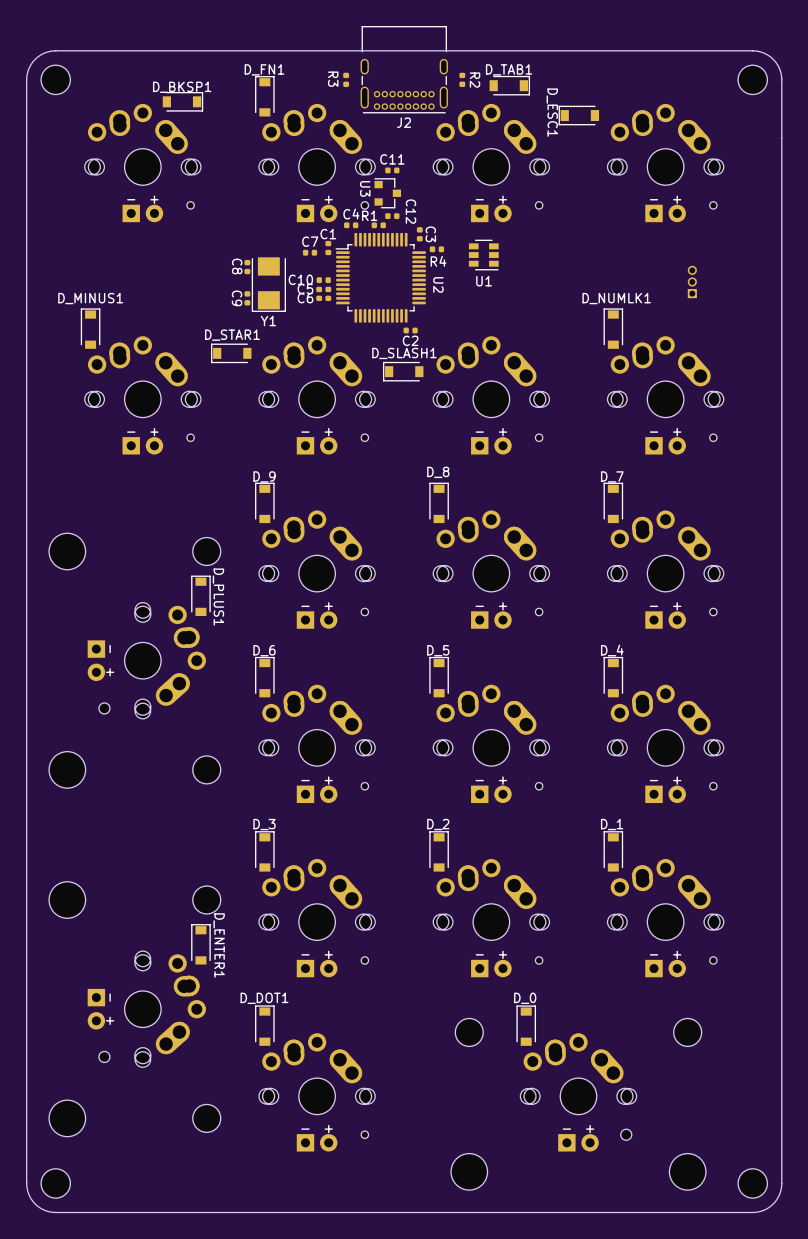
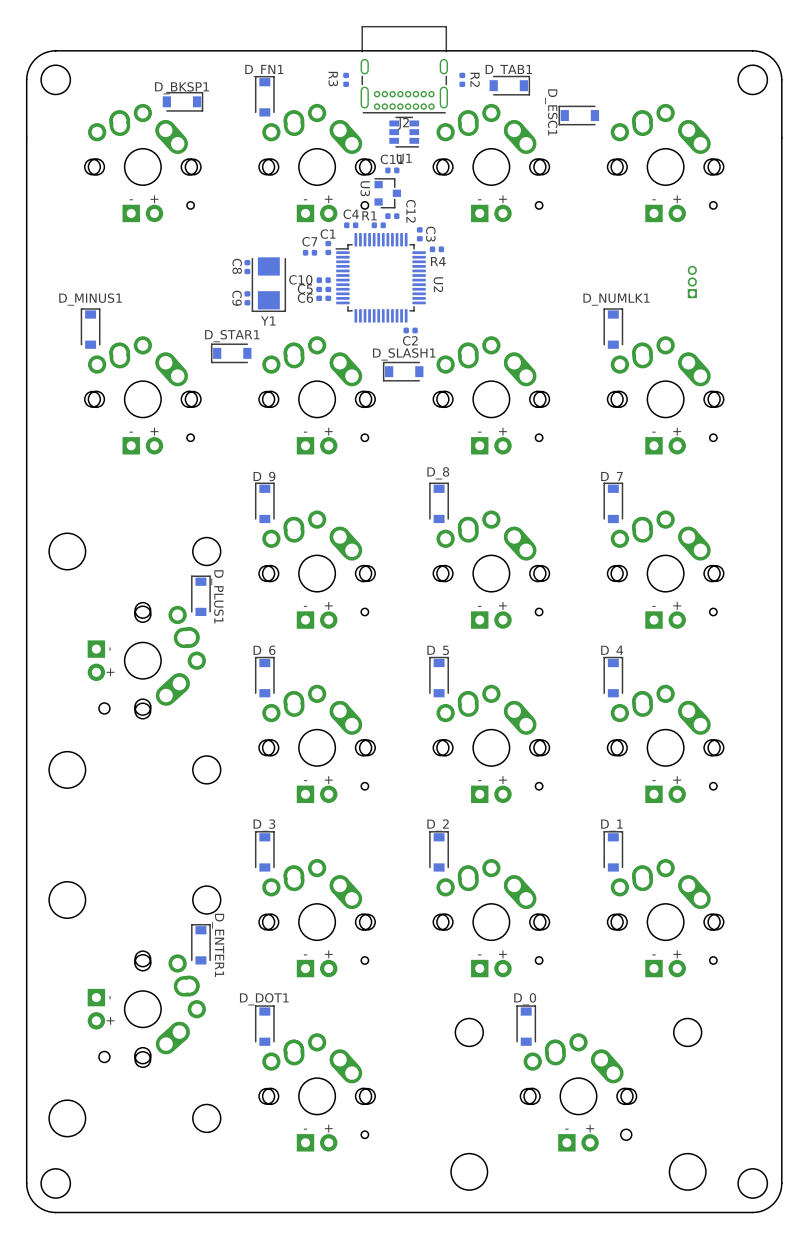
U1 position: (483, 255) -> (404, 132)

